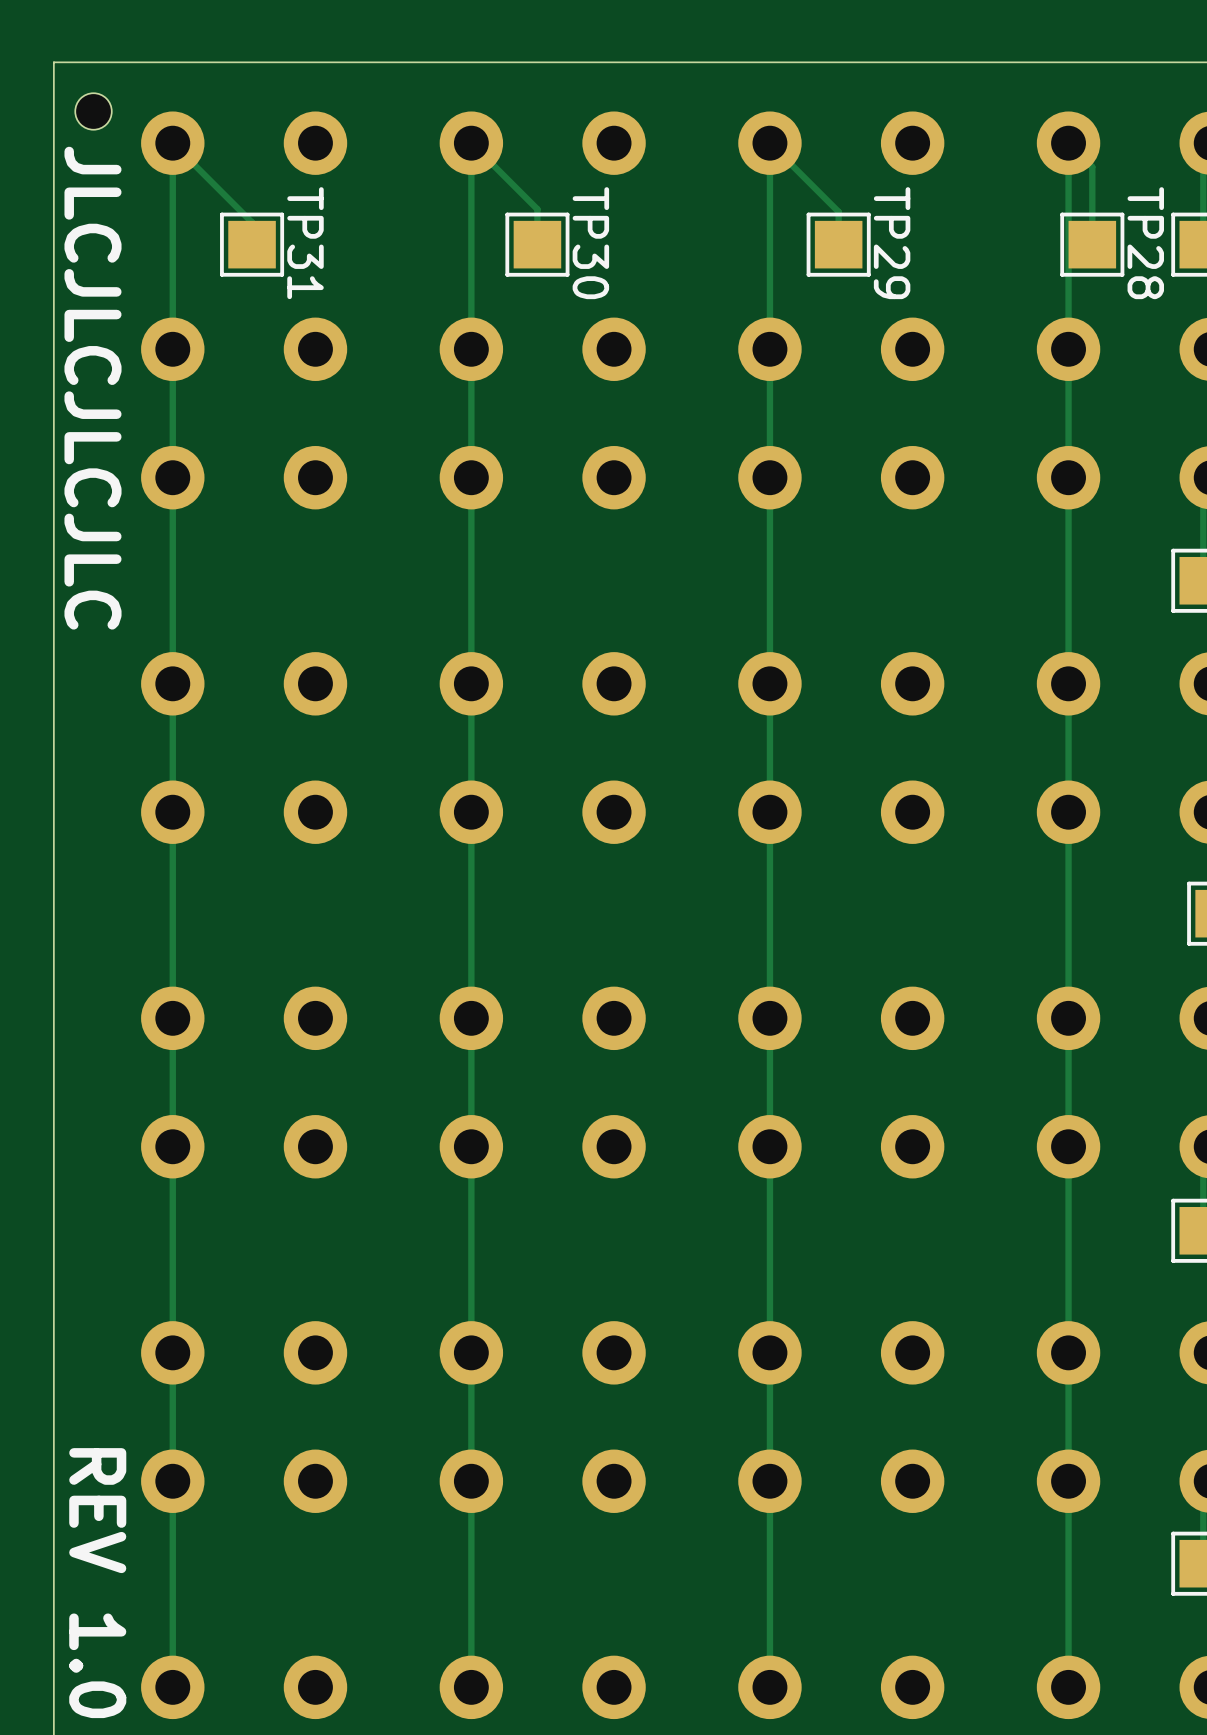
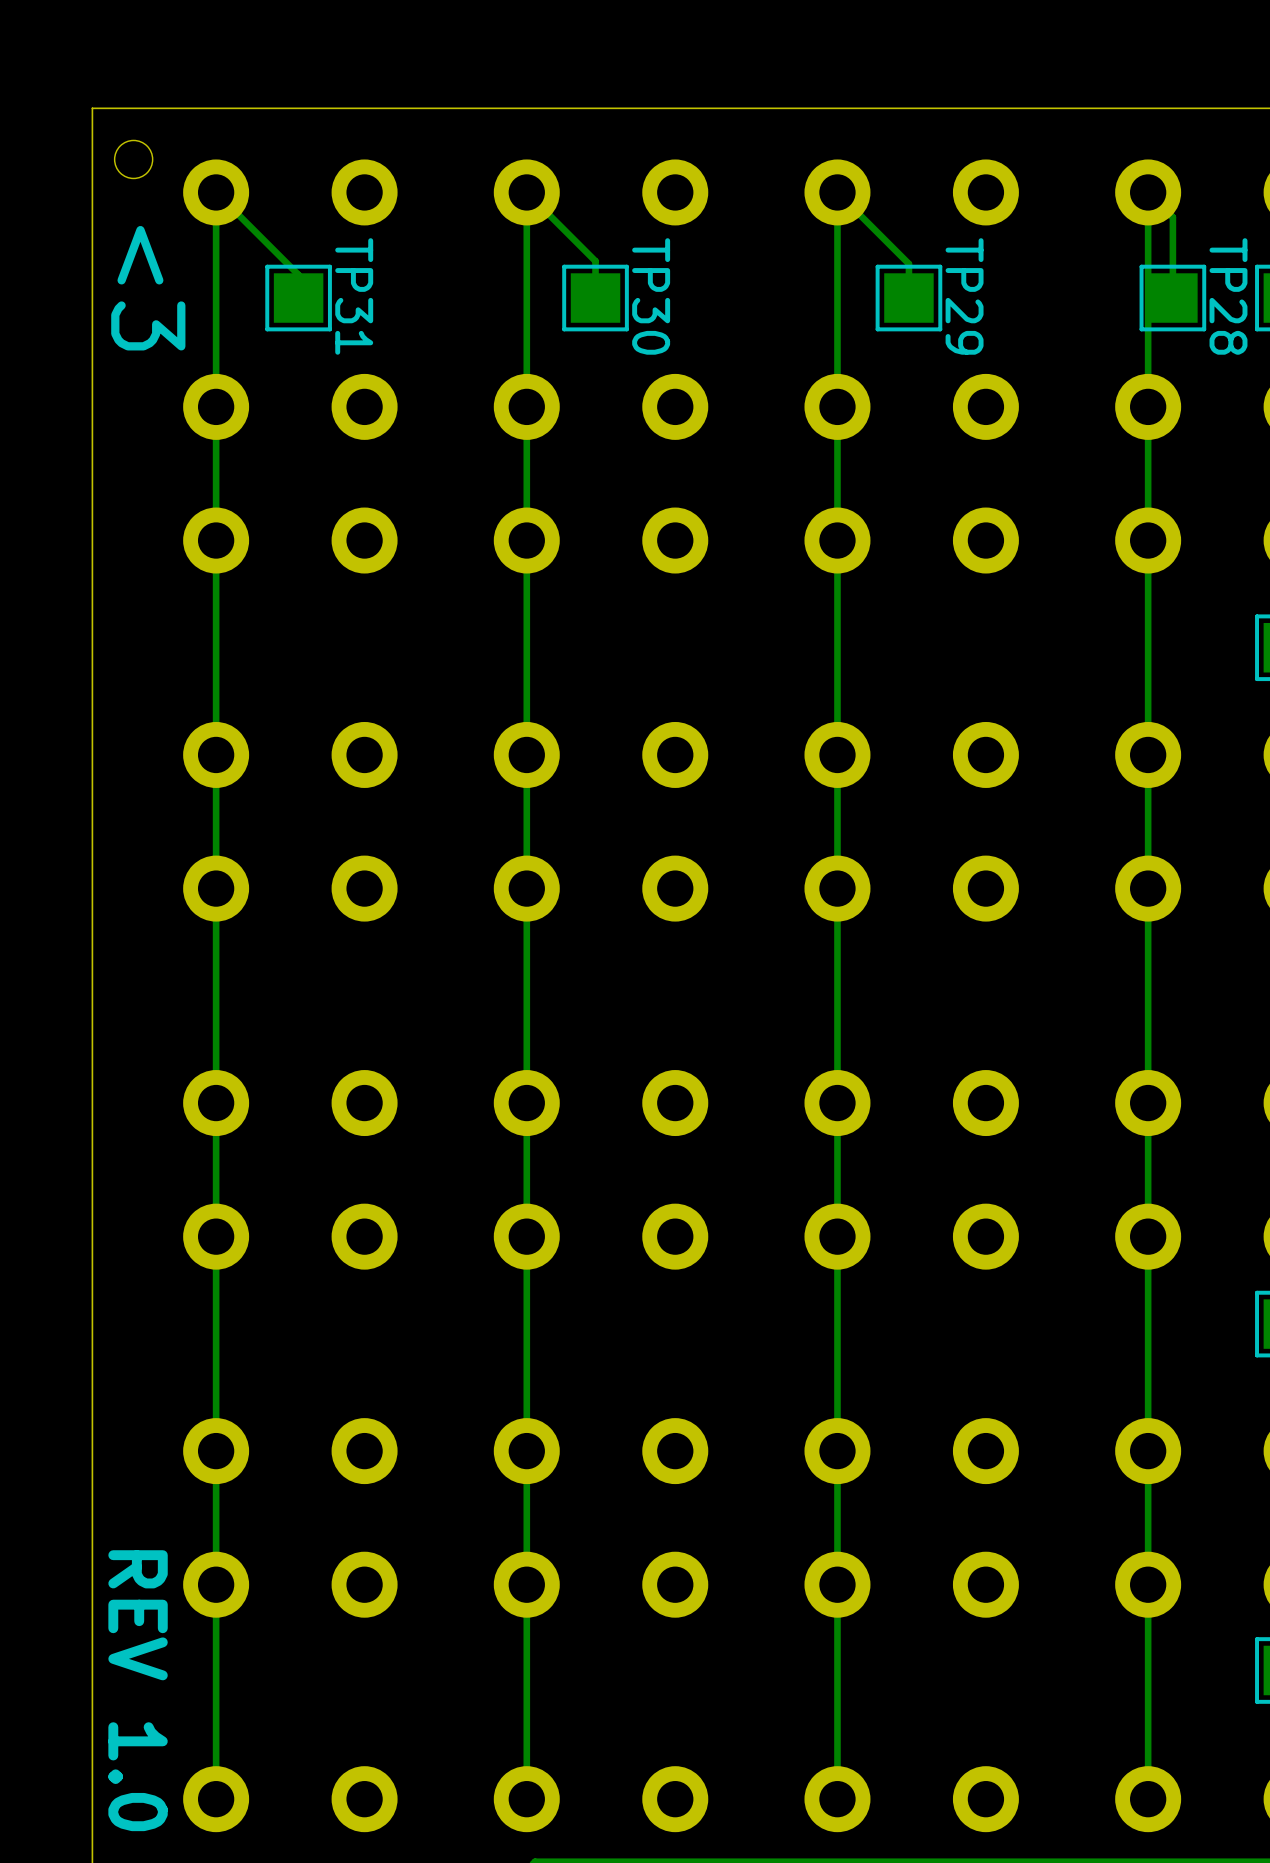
text: JLCJLCJLCJLC (92, 388) -> <3 (148, 288)

